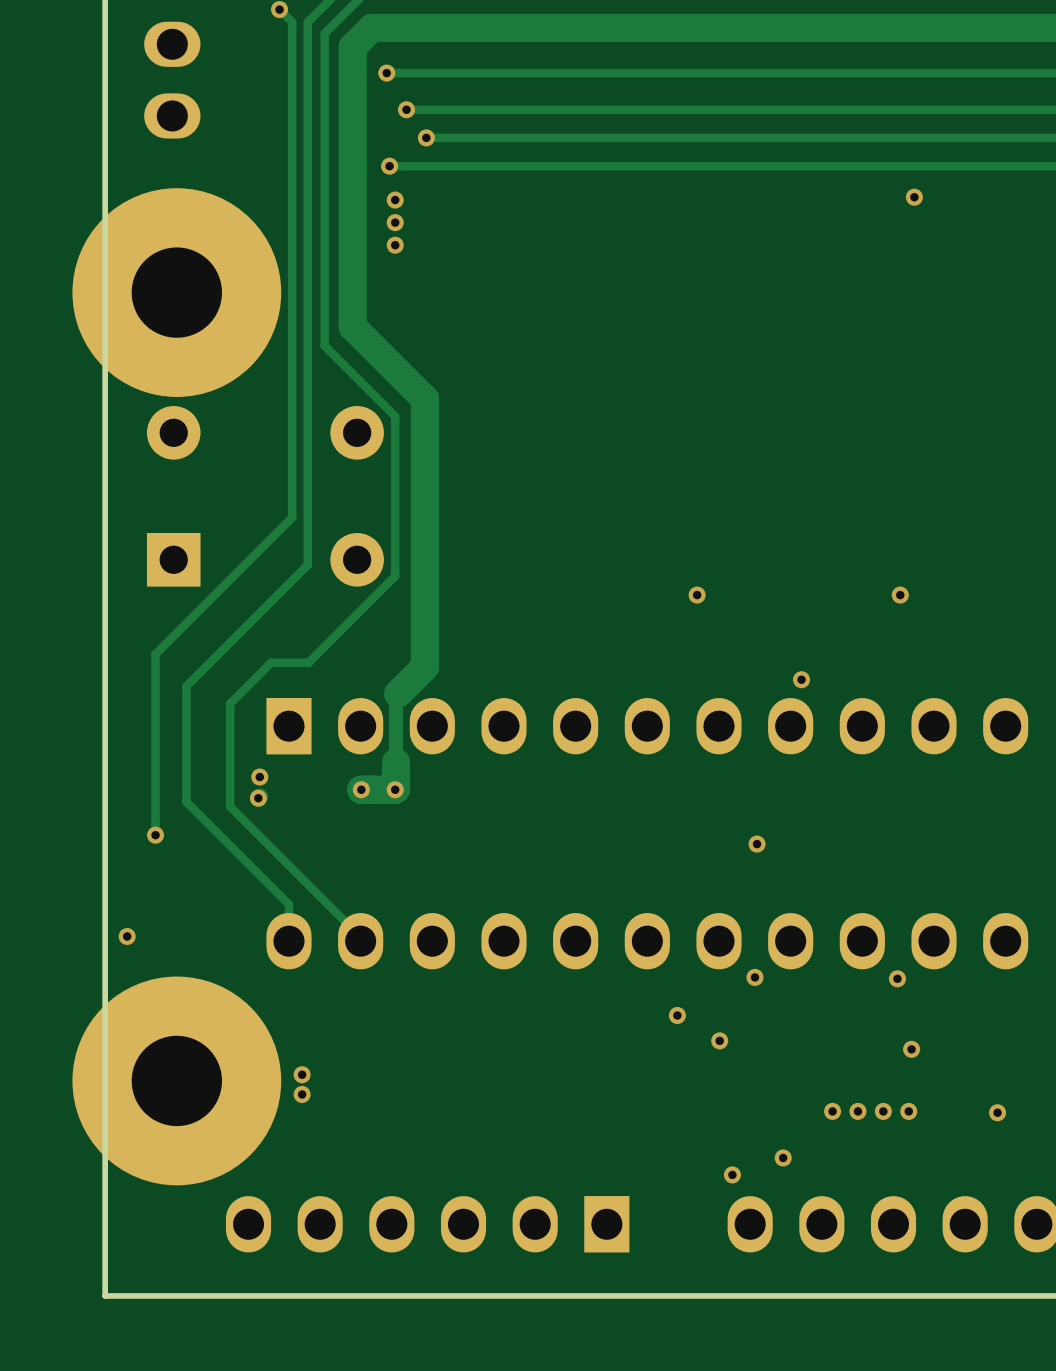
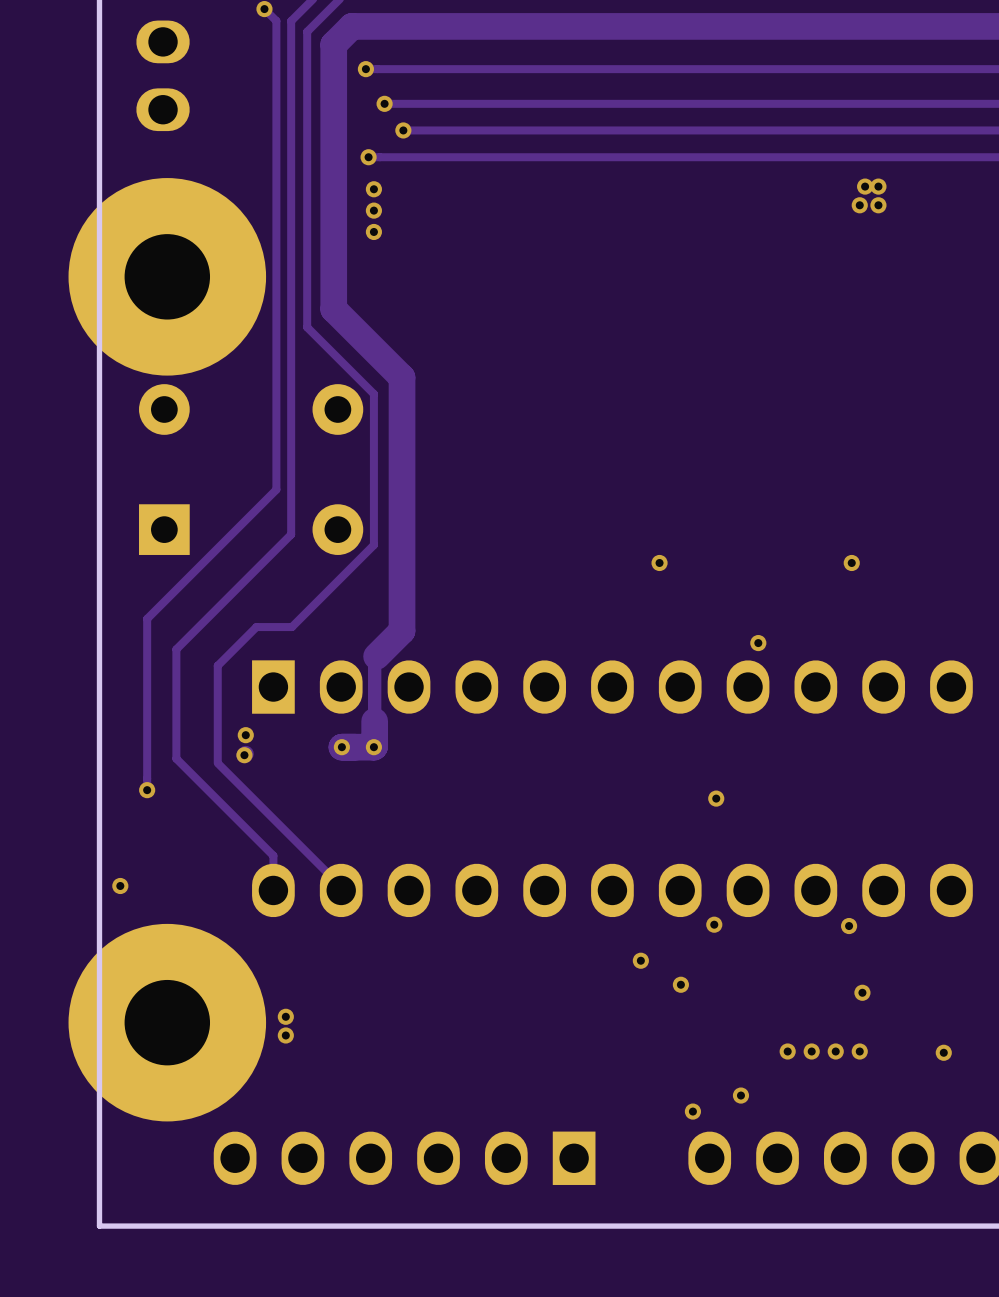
via: none -> (878, 186)
via: none -> (859, 205)
via: none -> (878, 205)

